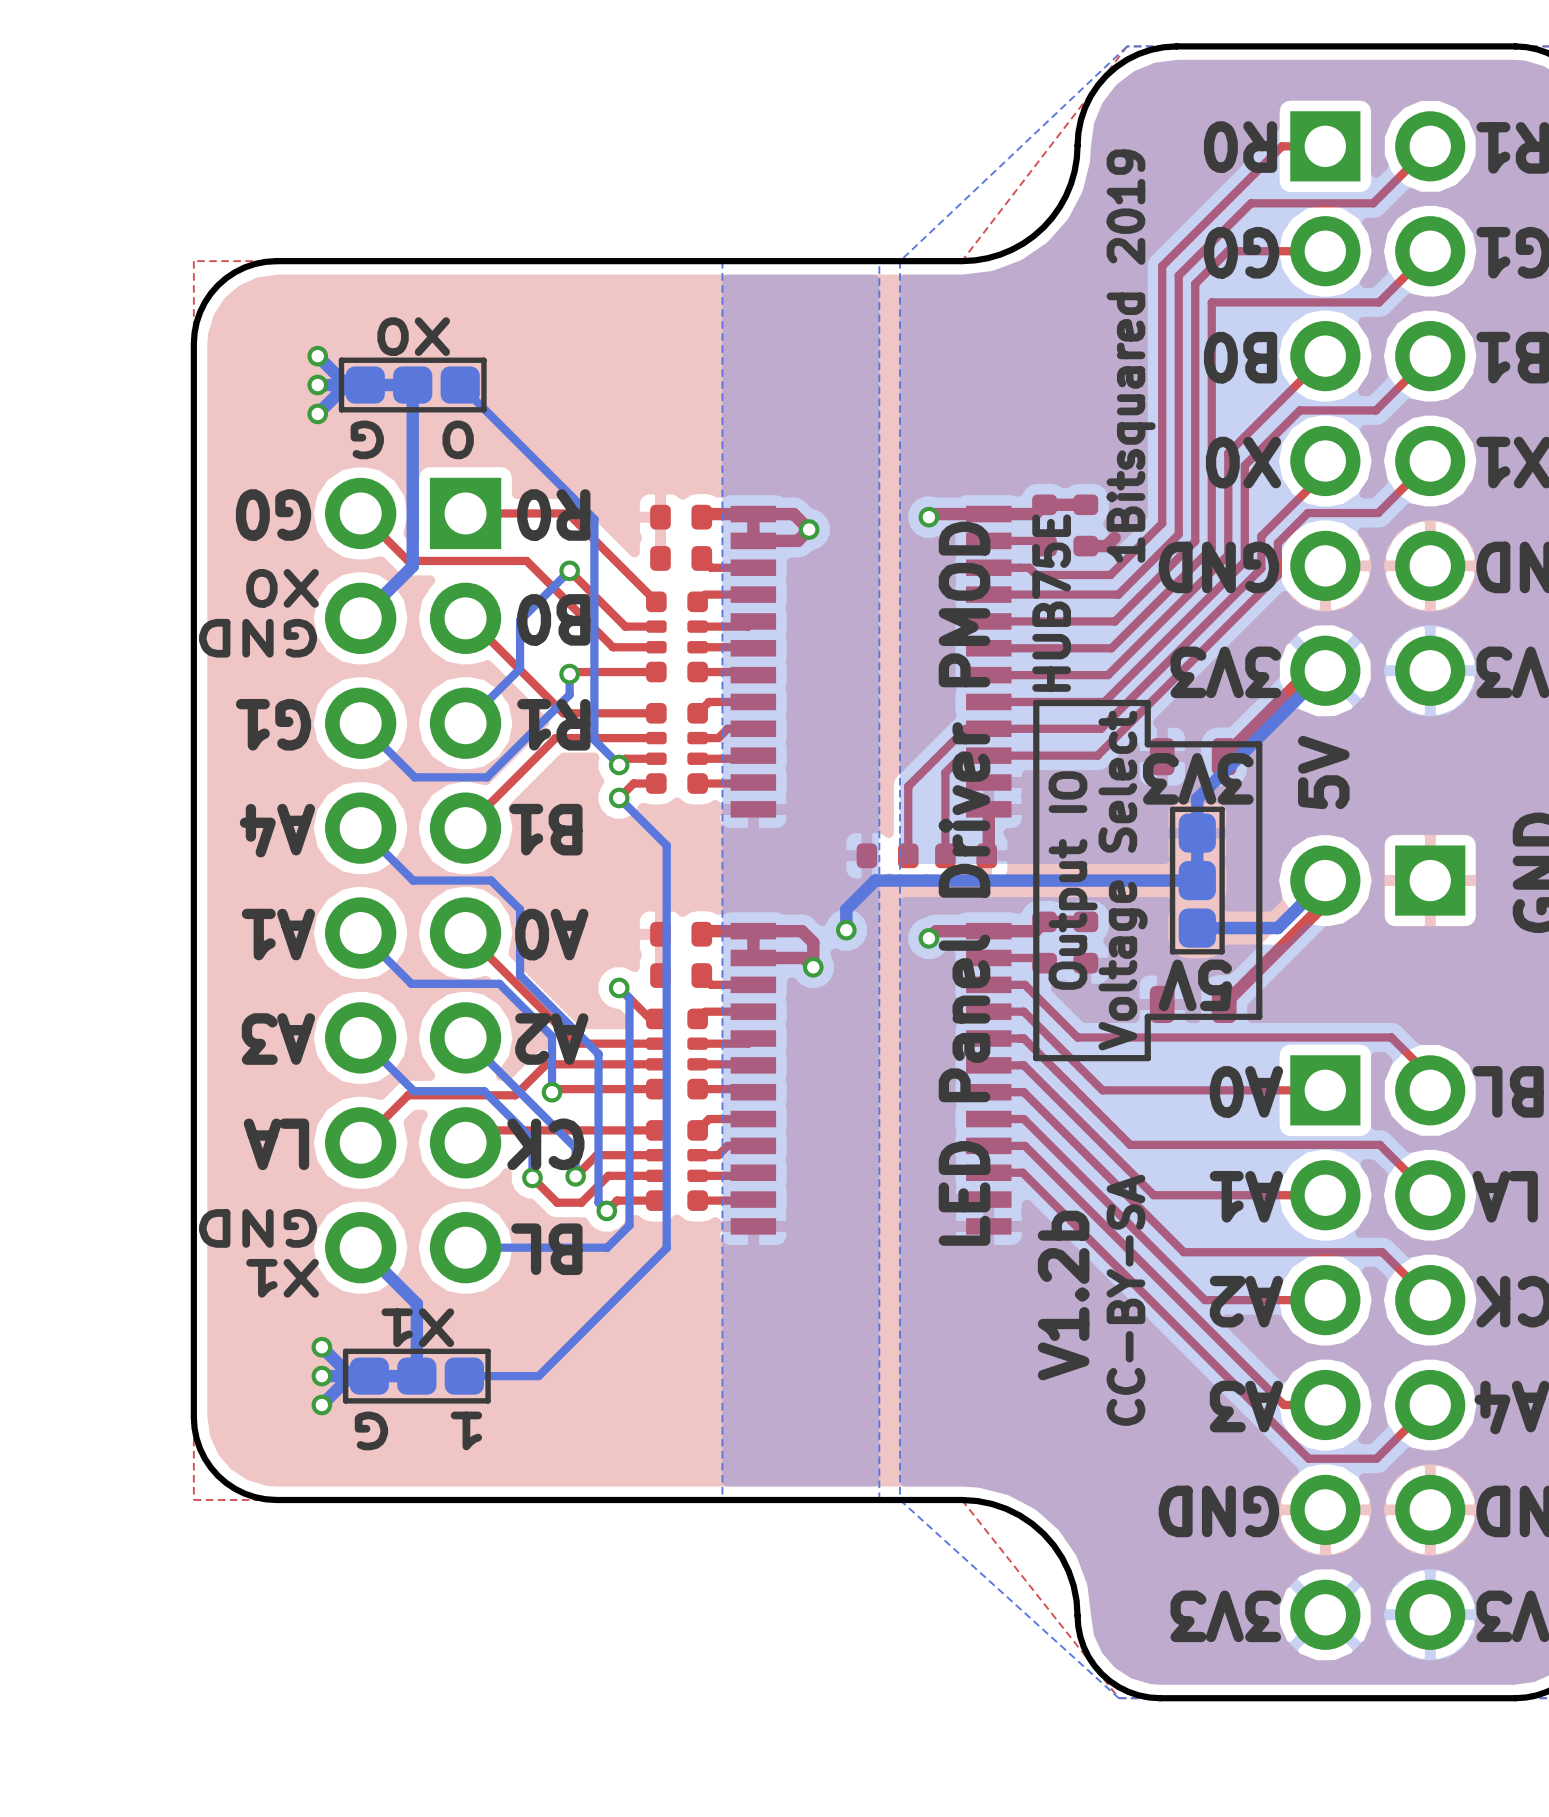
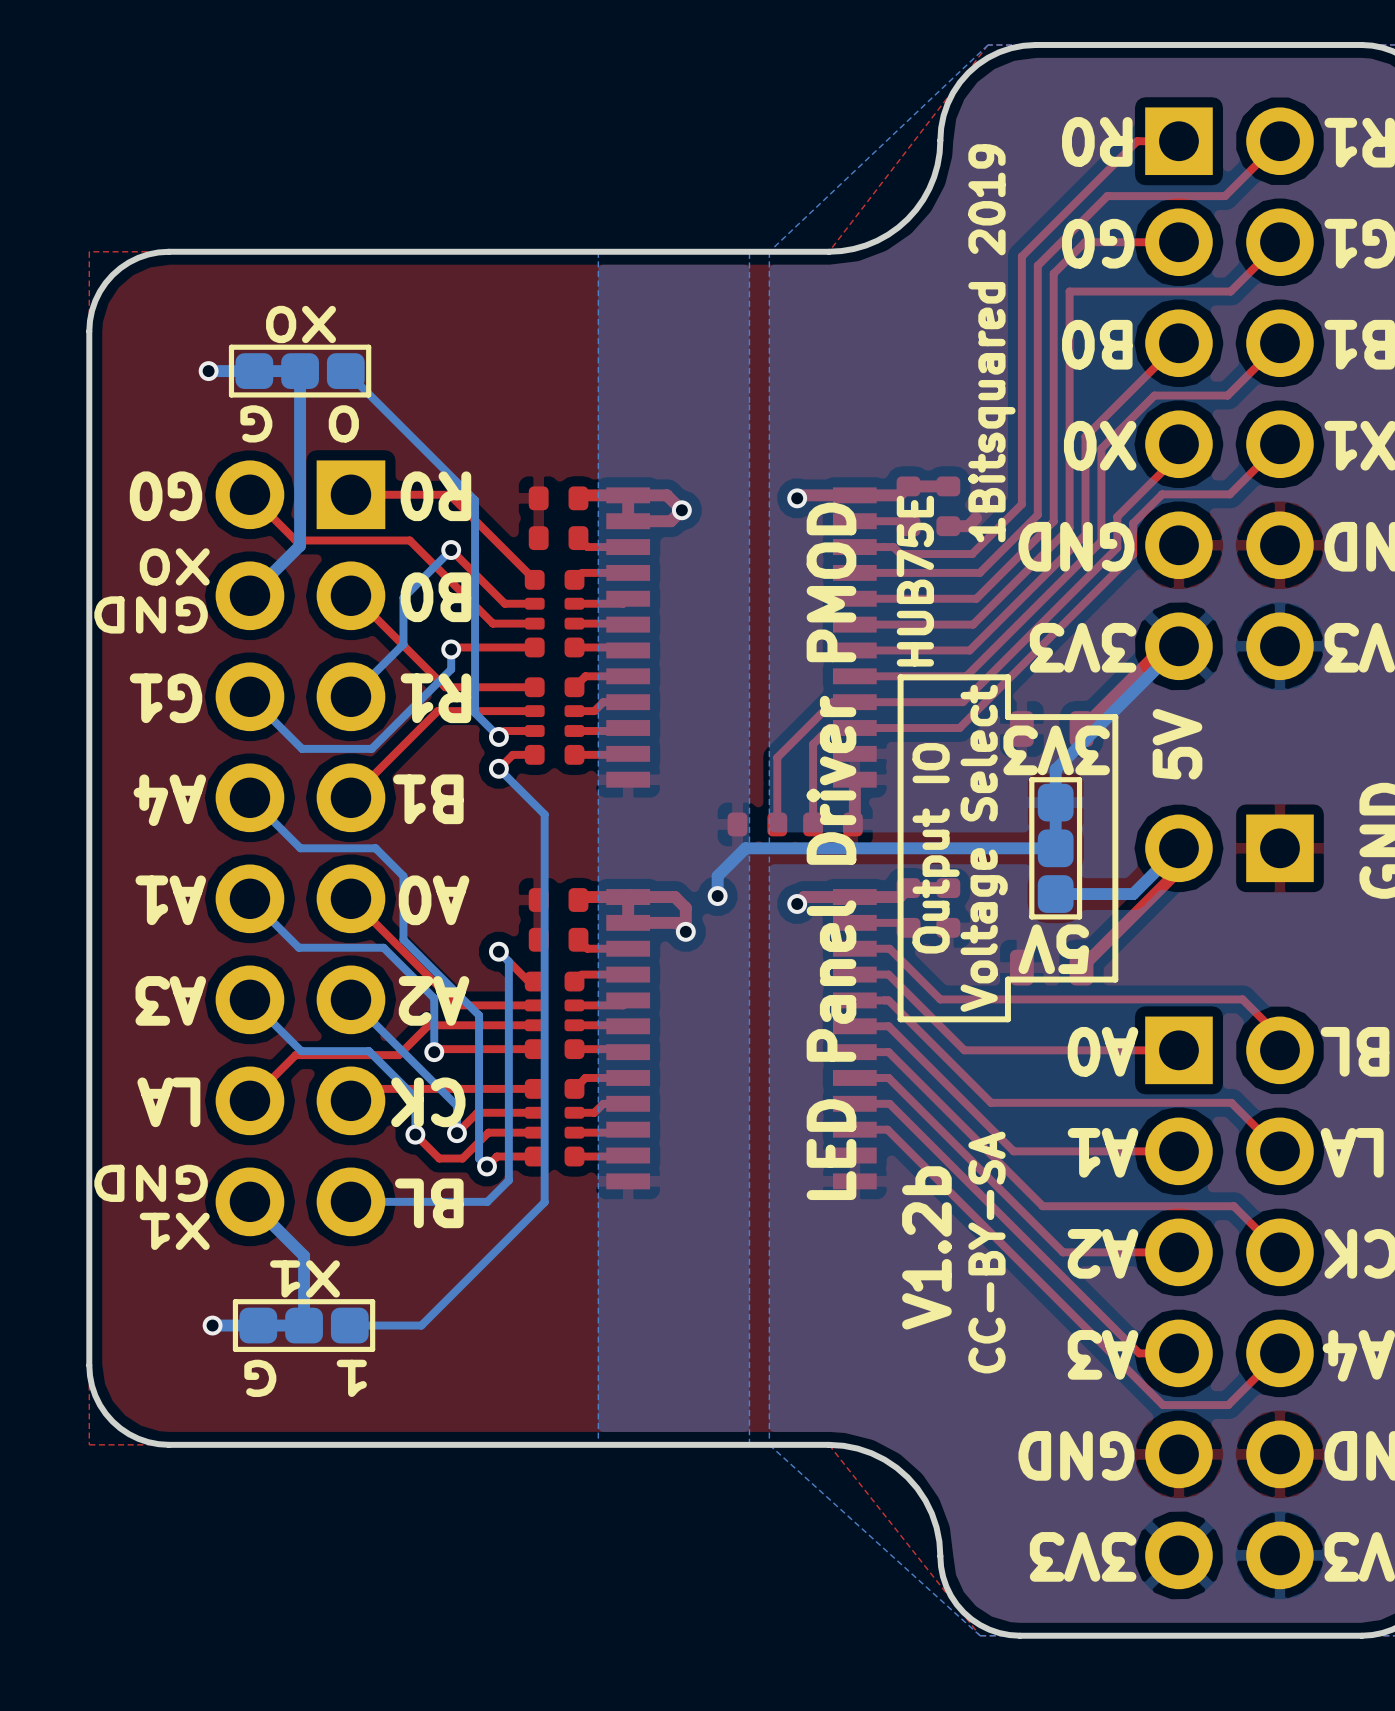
bottom track: (317, 356) (346, 385) (317, 413) -> none
via: (317, 356) -> none
via: (317, 413) -> none
bottom track: (321, 1347) (350, 1376) (321, 1405) -> none
via: (321, 1347) -> none
via: (321, 1405) -> none

